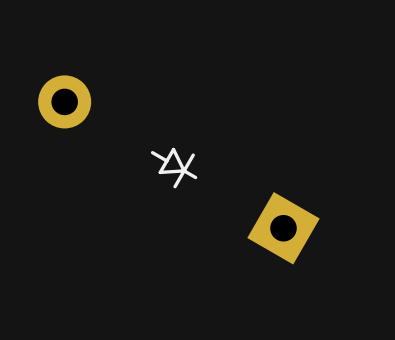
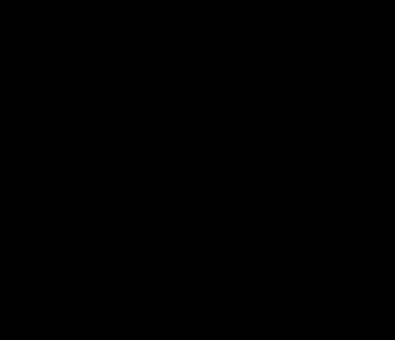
part: (178, 169) -> none

